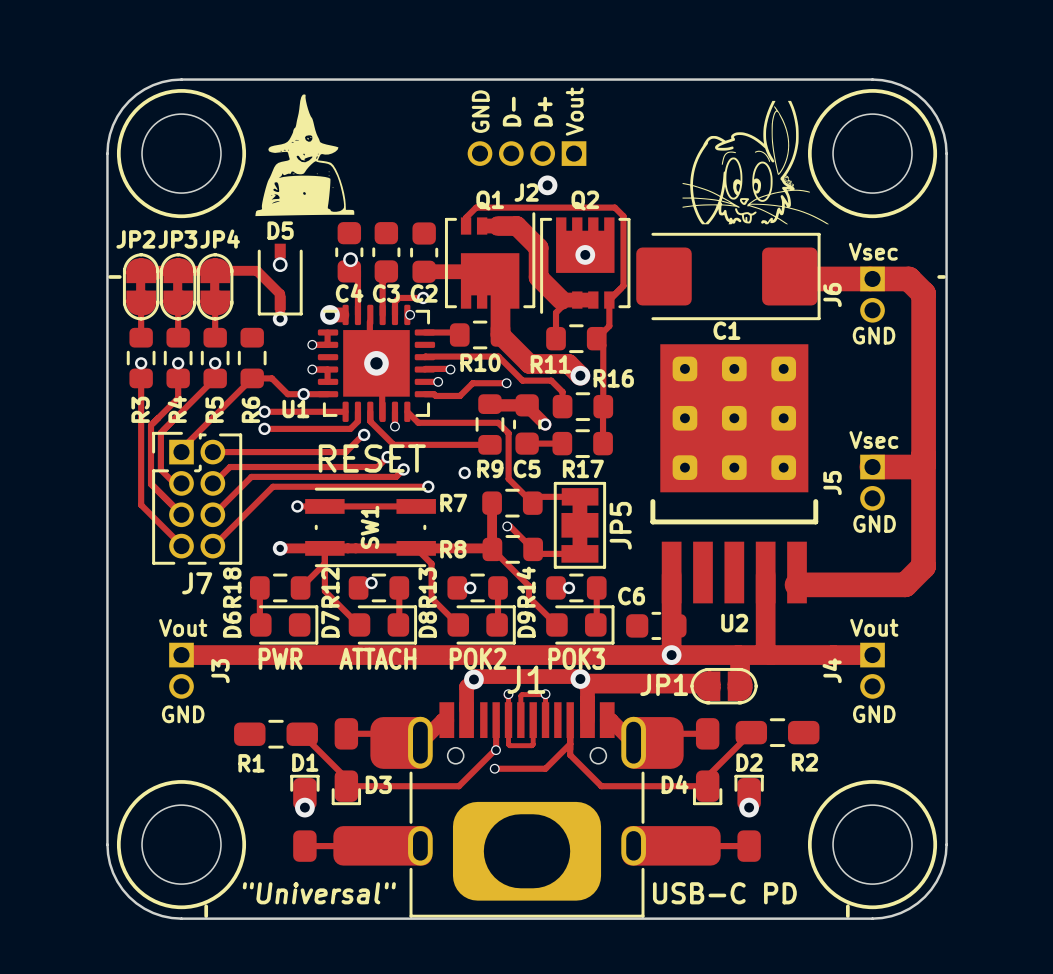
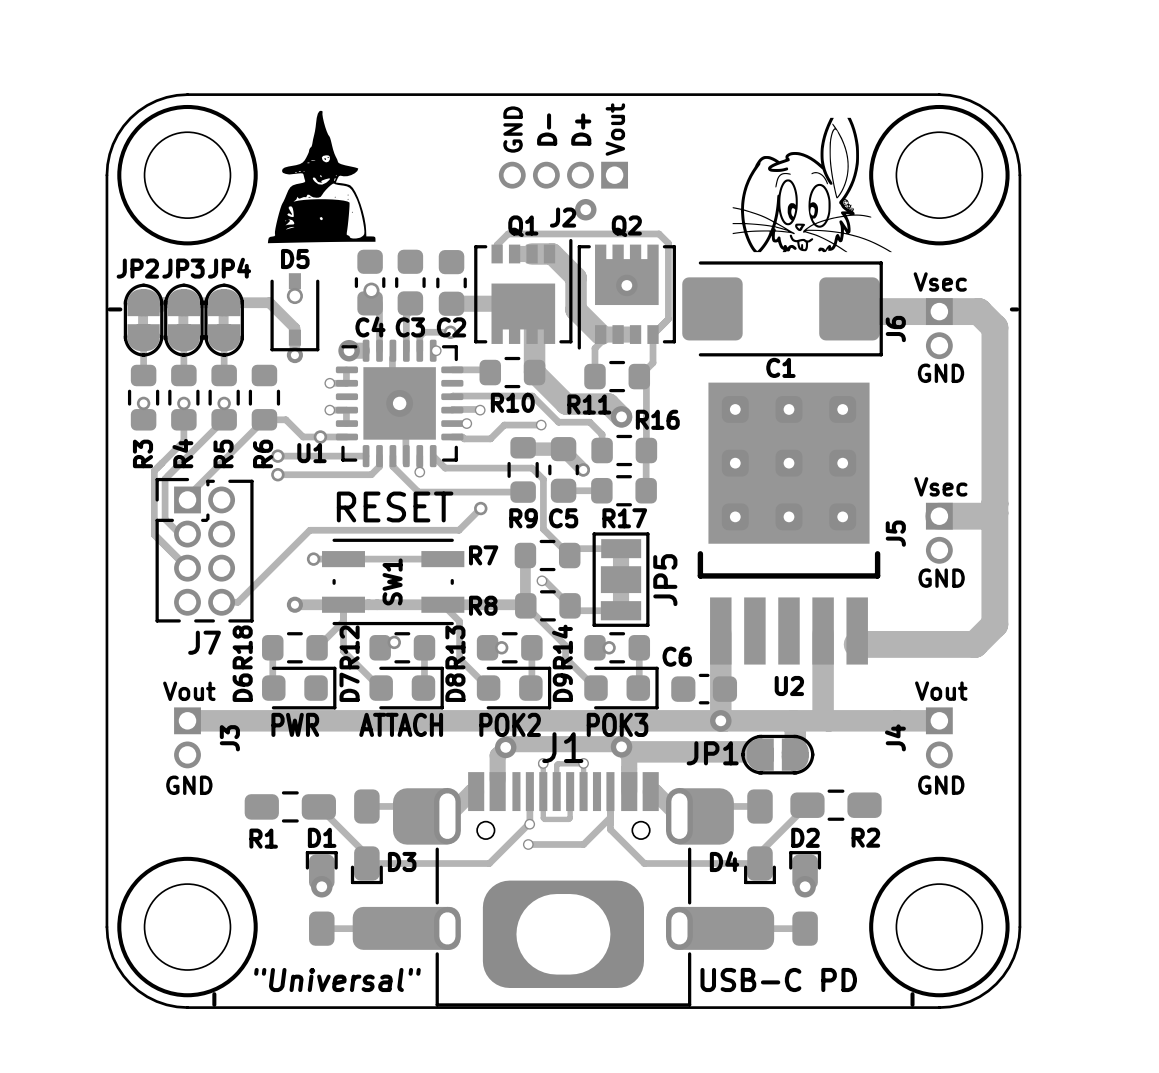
track: (141, 378) (141, 505) (182, 546) -> none
track: (364, 434) (345, 452) (213, 452) -> none
via: (364, 434) -> none
track: (387, 457) (377, 467) (230, 467) (213, 483) -> none
via: (387, 457) -> none
via: none -> (480, 508)
track: (403, 469) (396, 476) (251, 476) (213, 514) -> none
via: (403, 469) -> none
via: (464, 472) -> none
track: (428, 486) (272, 486) (213, 546) -> (480, 508) (459, 530) (309, 530) (237, 602) (221, 602)
via: (428, 486) -> none

